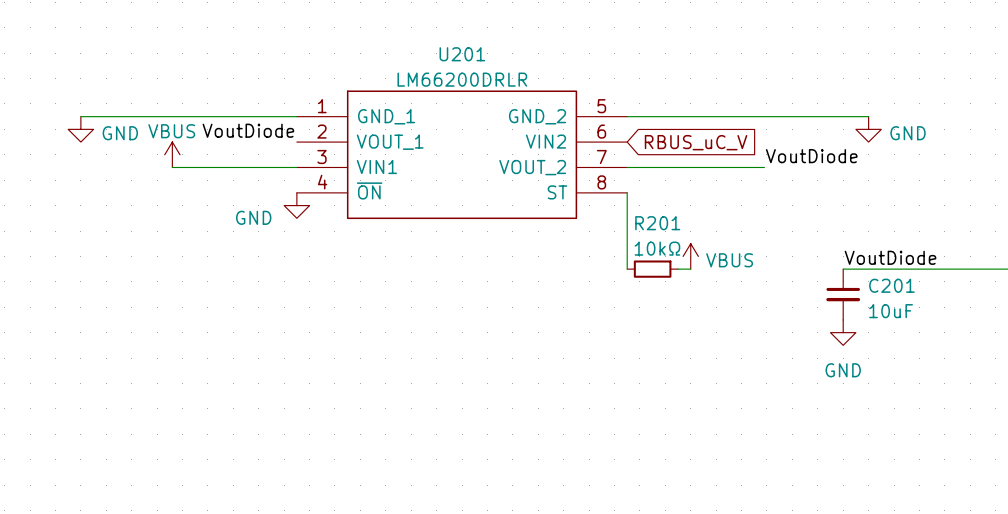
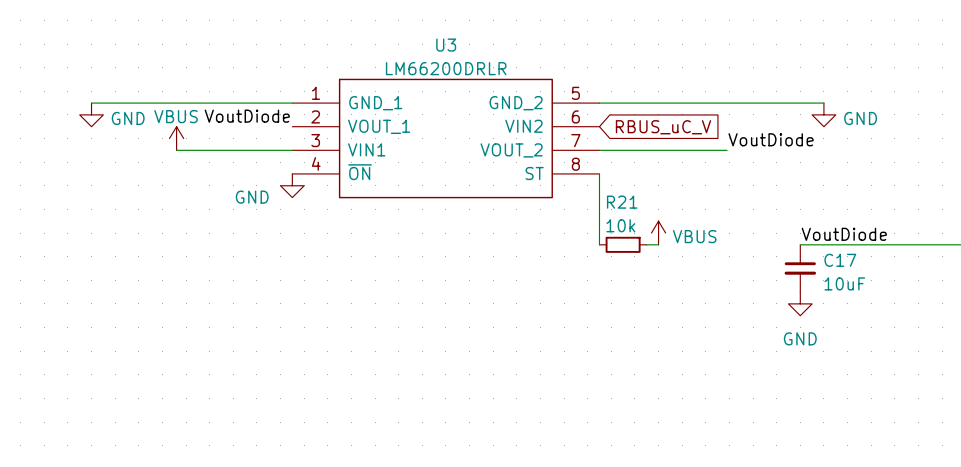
U201 name: U201 (462, 54) -> U3 (446, 45)
R201 name: R201 (657, 223) -> R21 (622, 202)
R201 value: 10kΩ (657, 248) -> 10k (620, 225)
C201 name: C201 (891, 285) -> C17 (840, 260)

